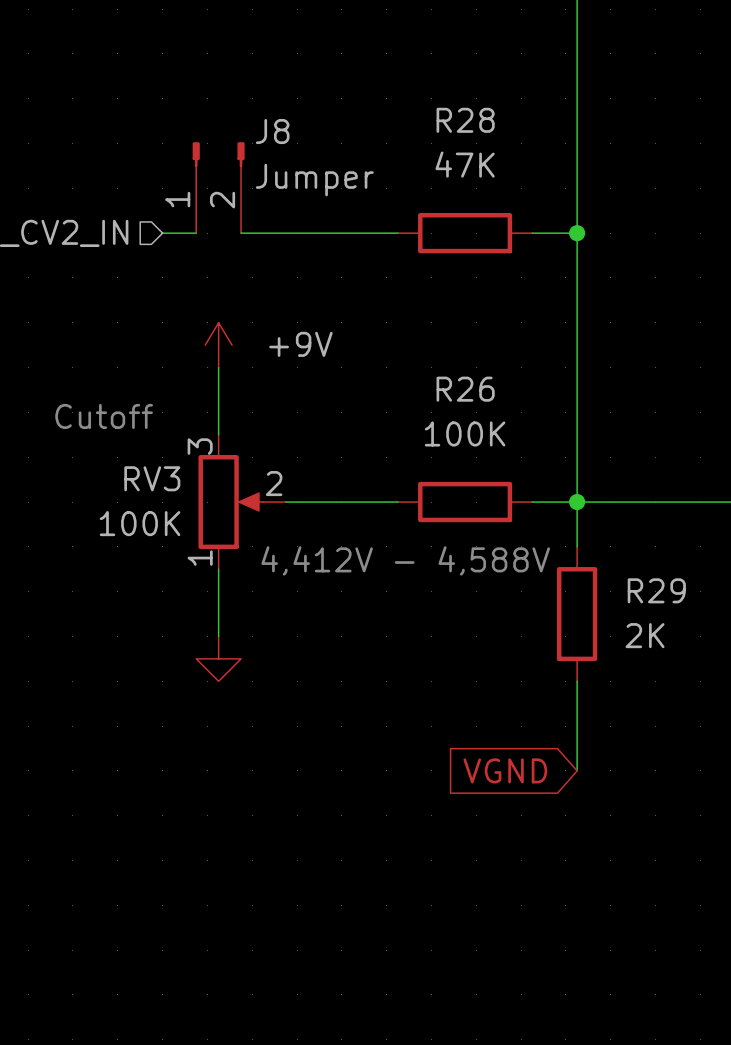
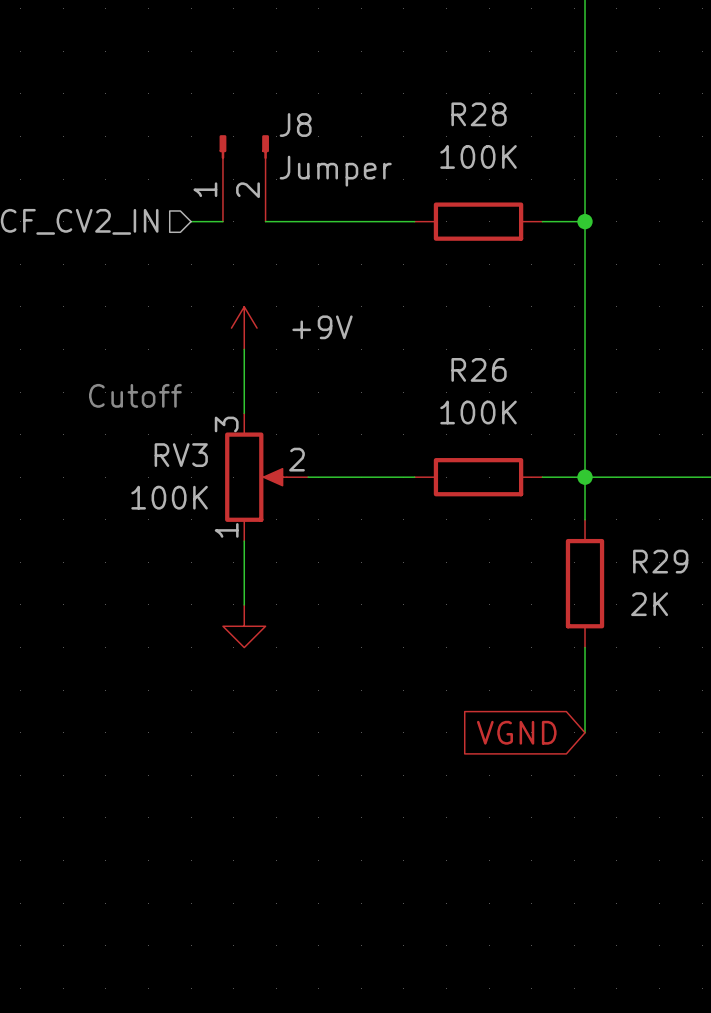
R28 value: 47K (465, 164) -> 100K (478, 156)
text: 4,412V - 4,588V (405, 560) -> none

